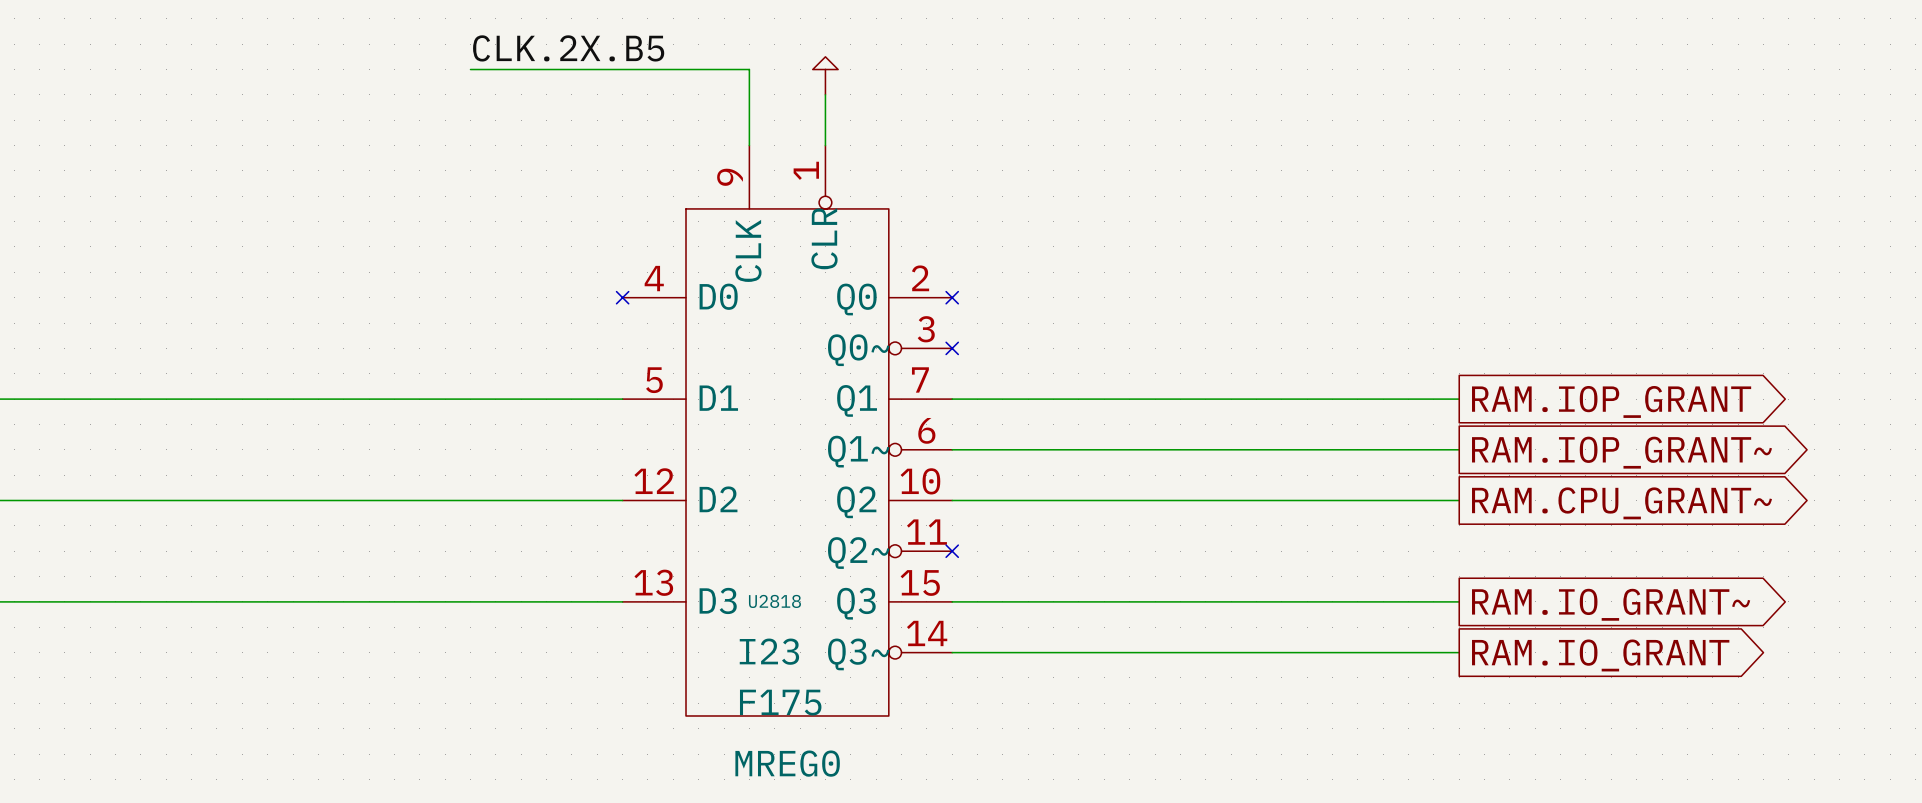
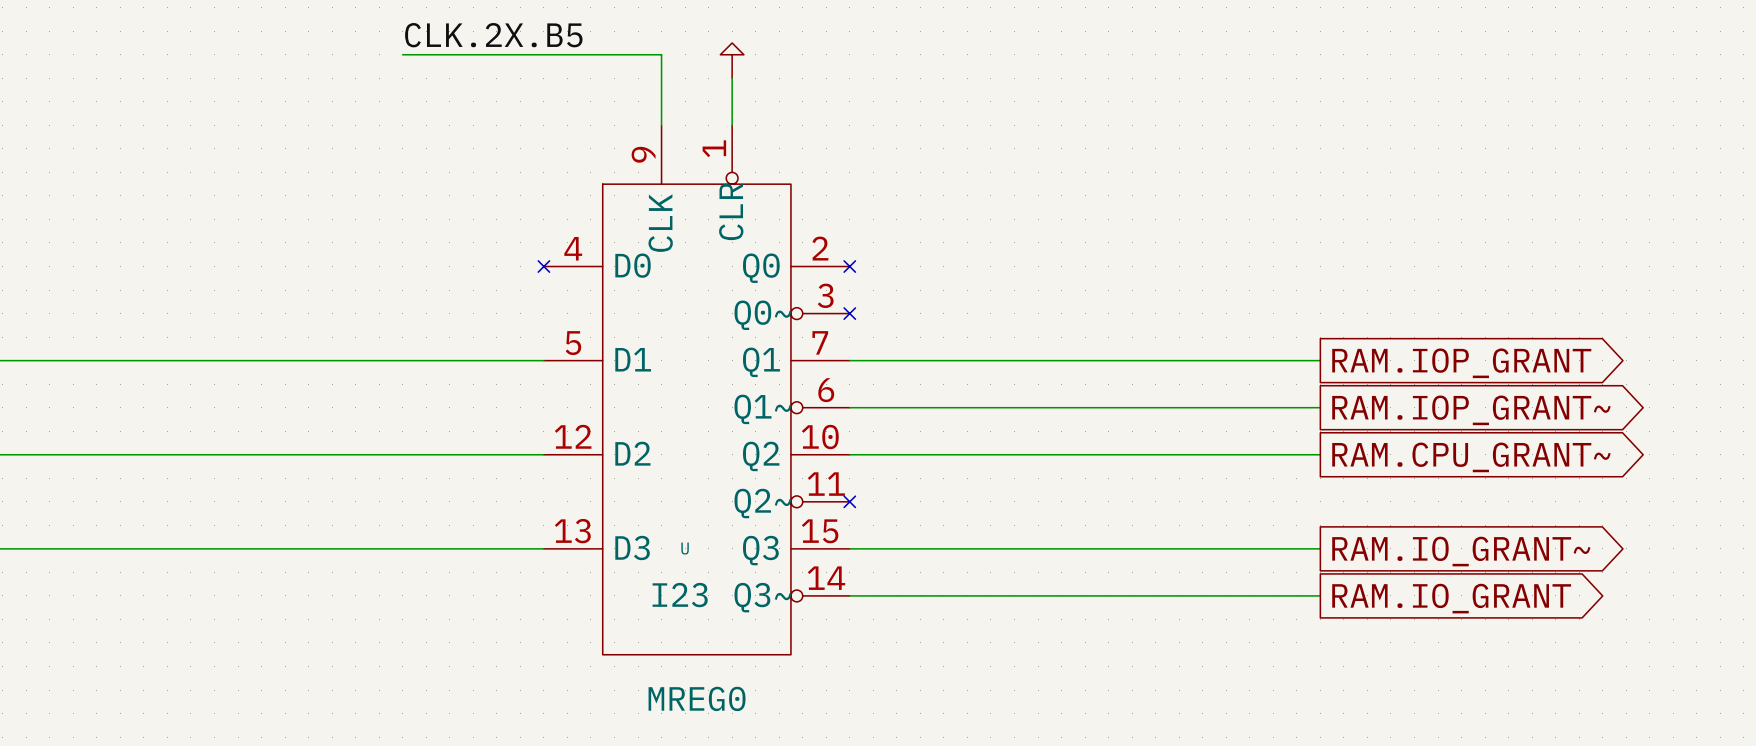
U2818 name: U2818 (774, 601) -> U (685, 548)
U2818 value: F175 (780, 702) -> none

